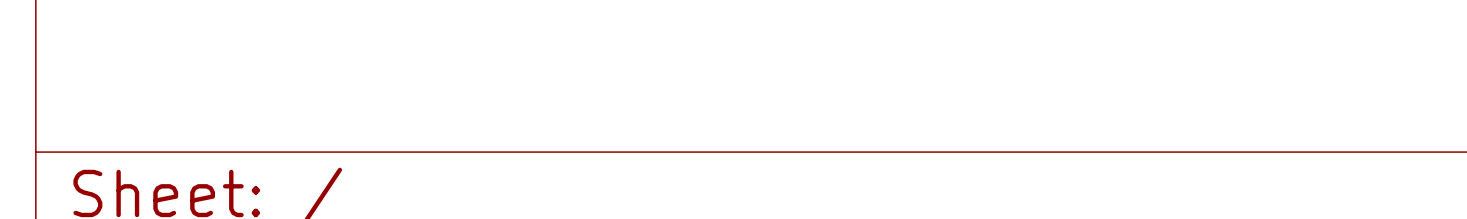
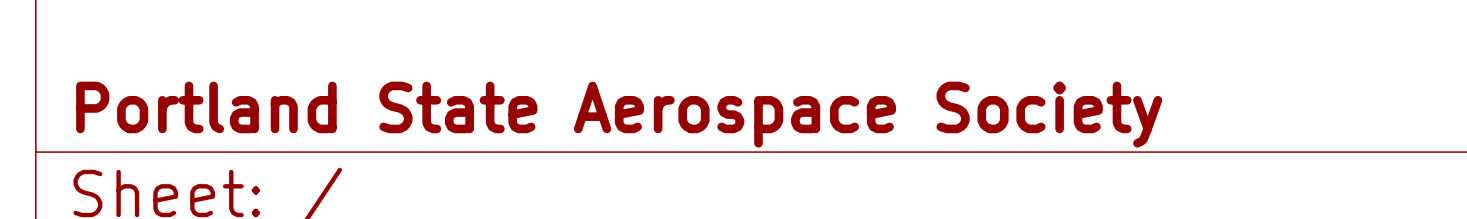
title block: none -> Portland State Aerospace Society (619, 114)

